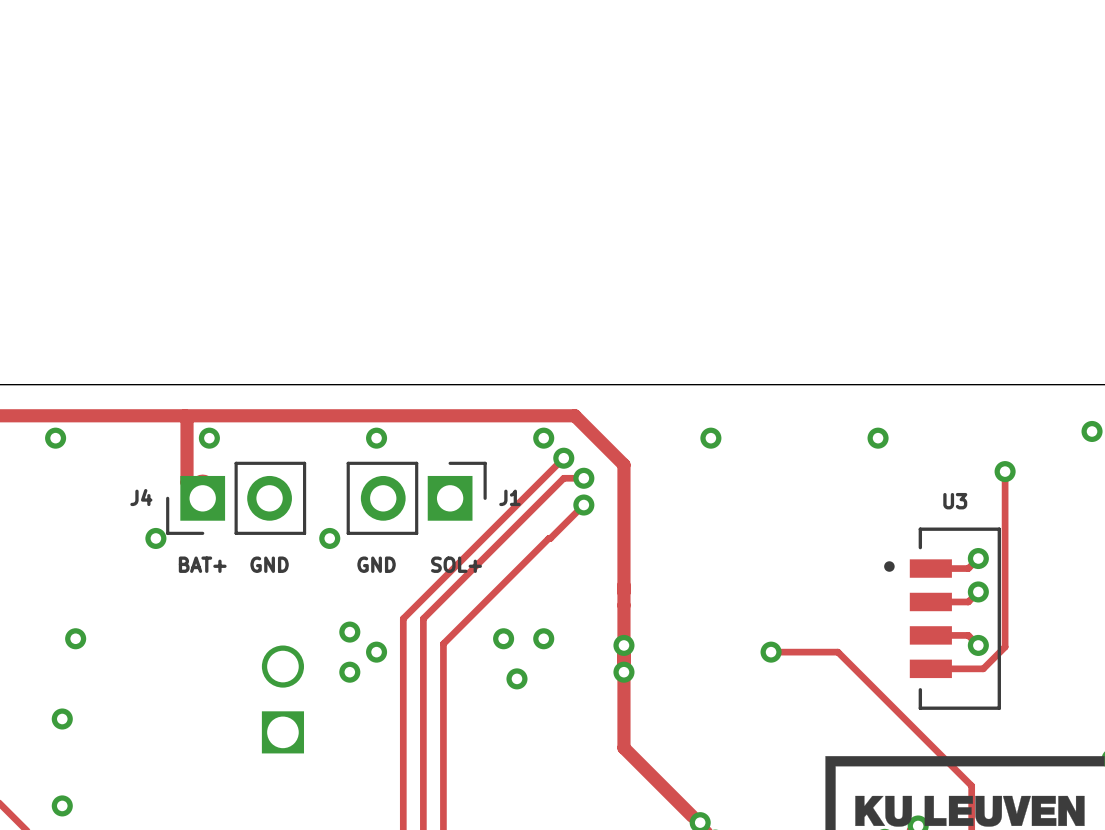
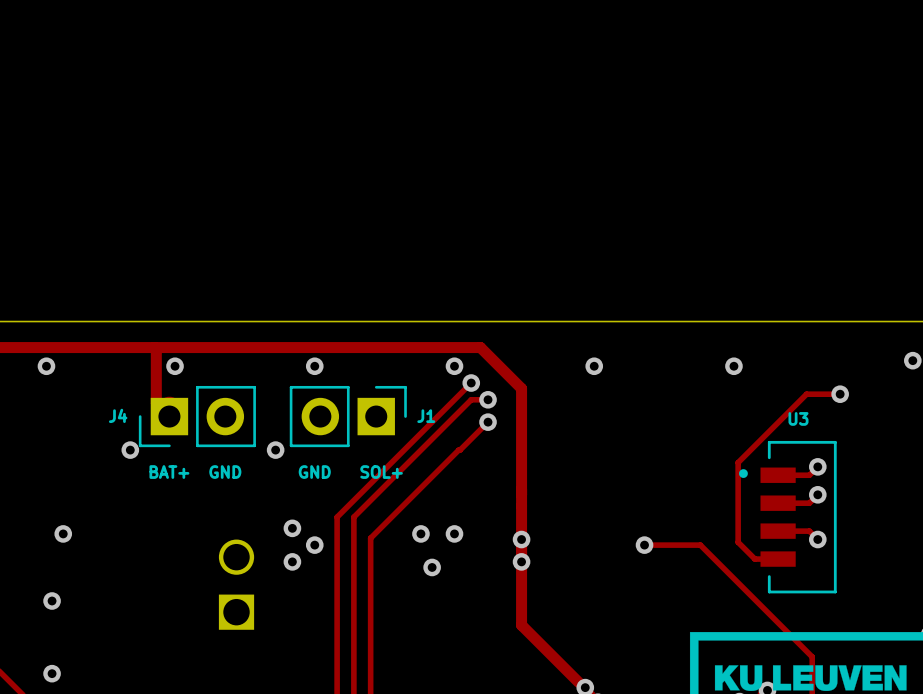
track: (1005, 471) (1005, 647) (983, 668) (930, 668) -> (840, 394) (806, 394) (738, 462) (738, 542) (754, 559) (778, 559)

